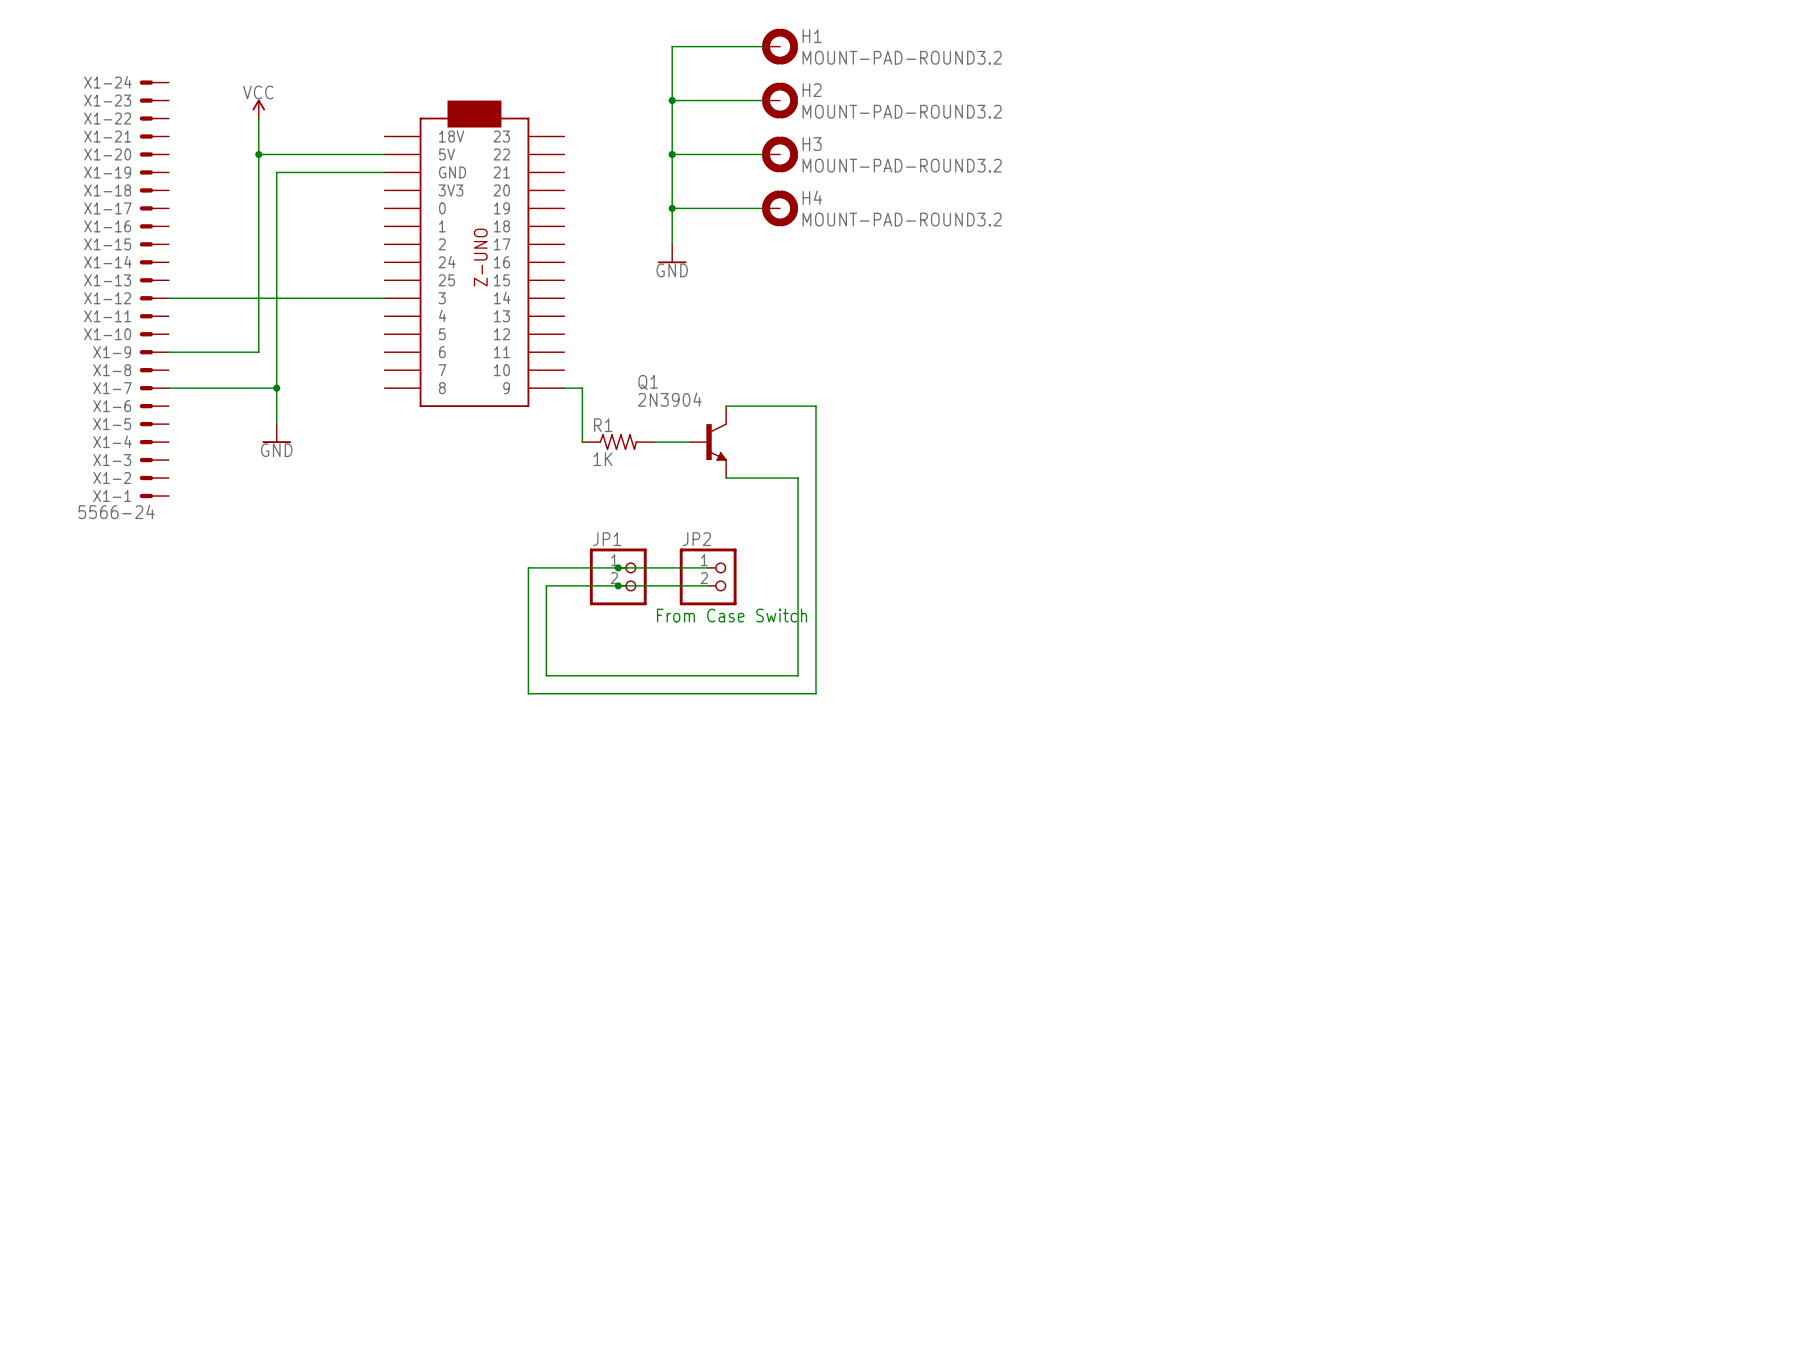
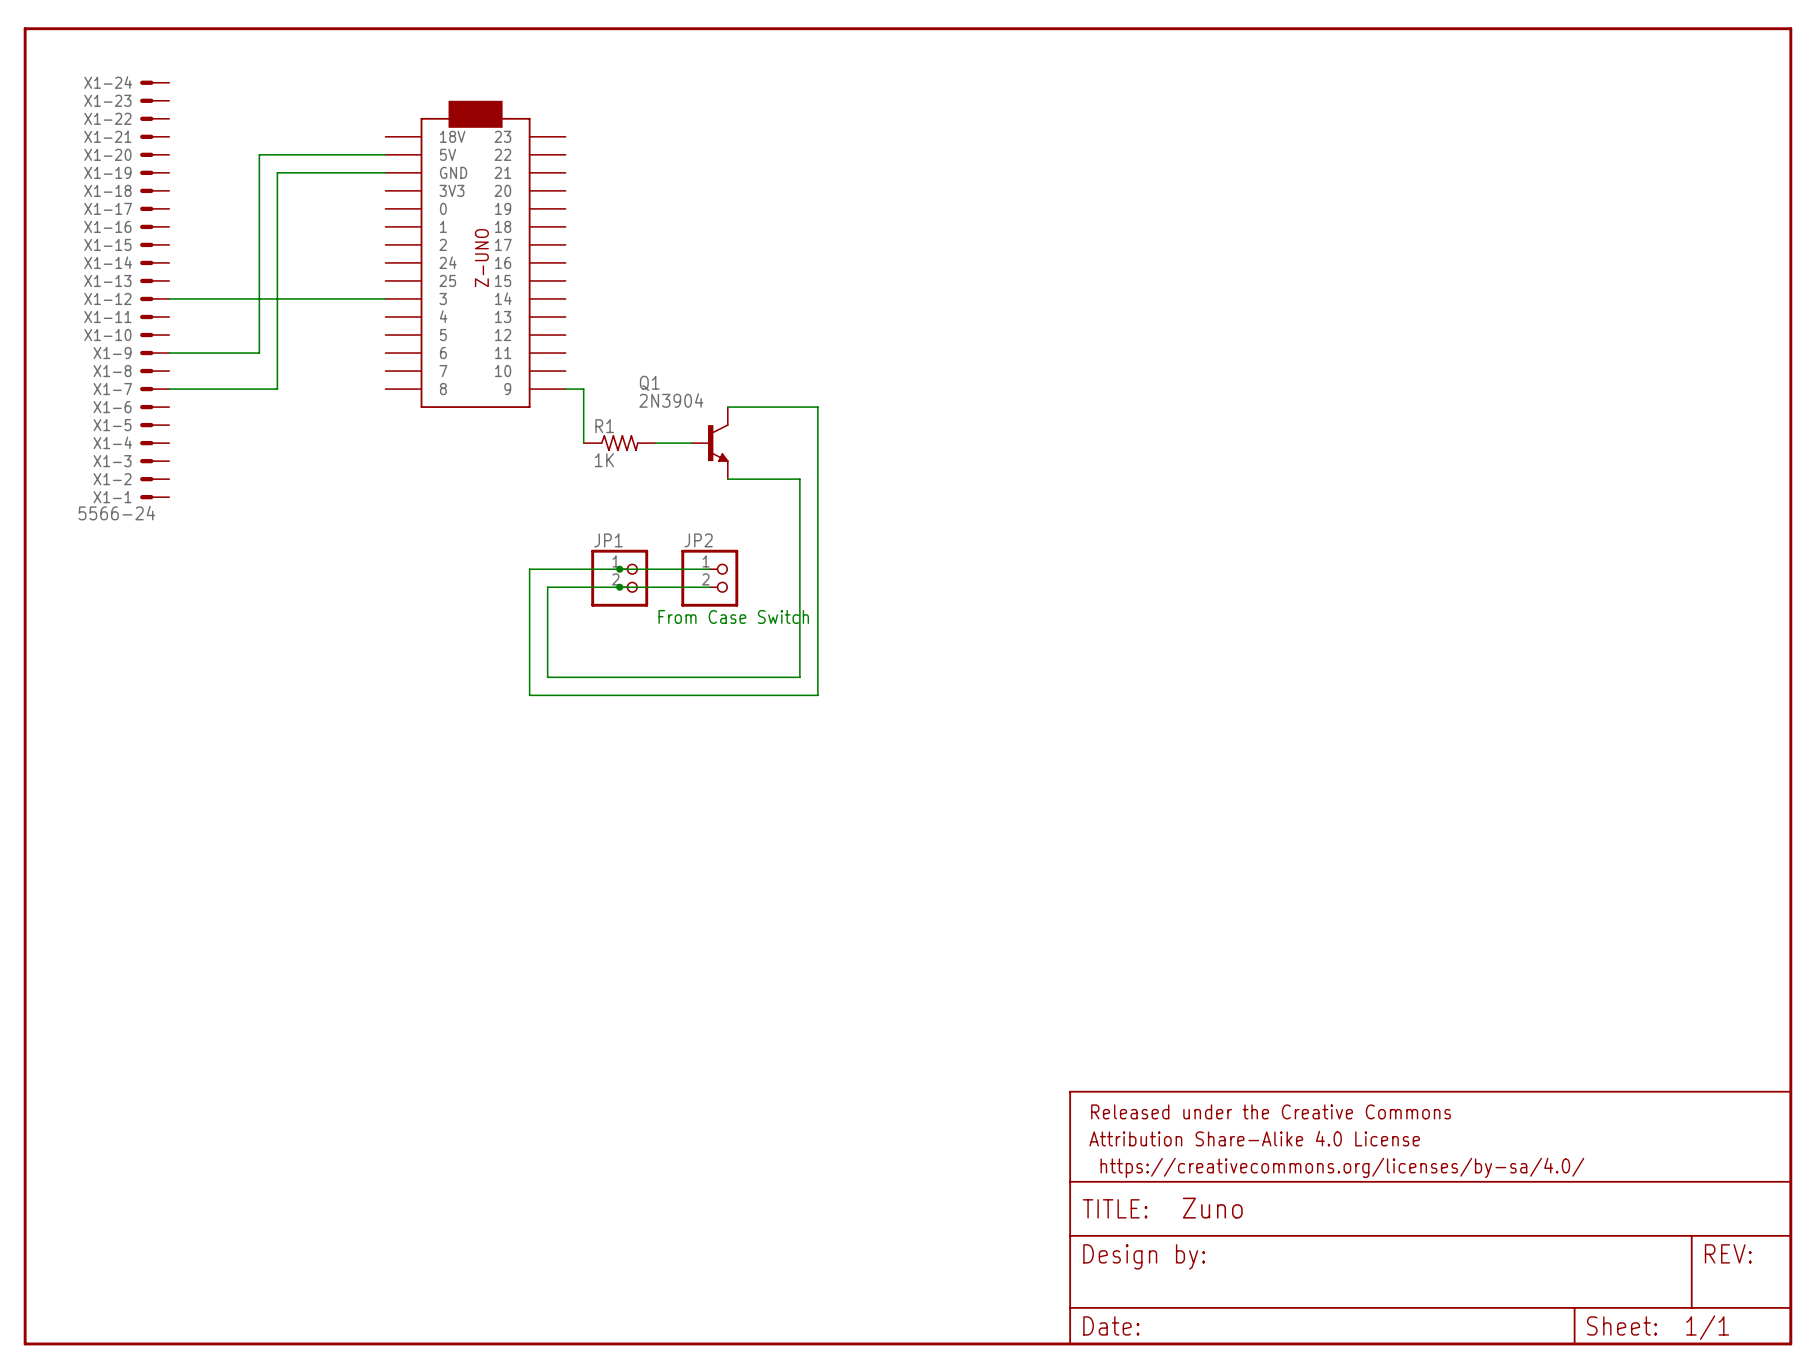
wire: (762, 46) (672, 46) (672, 244) -> none
H1: MOUNT-PAD-ROUND3.2 (780, 46) -> none
wire: (672, 100) (762, 100) -> none
junction: (672, 100) -> none
H2: MOUNT-PAD-ROUND3.2 (780, 100) -> none
power symbol: VCC (258, 109) -> none
wire: (258, 118) (258, 154) -> none
junction: (258, 154) -> none
wire: (672, 154) (762, 154) -> none
junction: (672, 154) -> none
H3: MOUNT-PAD-ROUND3.2 (780, 154) -> none
wire: (672, 208) (762, 208) -> none
junction: (672, 208) -> none
H4: MOUNT-PAD-ROUND3.2 (780, 208) -> none
power symbol: GND (672, 253) -> none
wire: (276, 388) (276, 424) -> none
junction: (276, 388) -> none
power symbol: GND (276, 433) -> none
part: none -> (907, 686)
part: none -> (1430, 1217)

